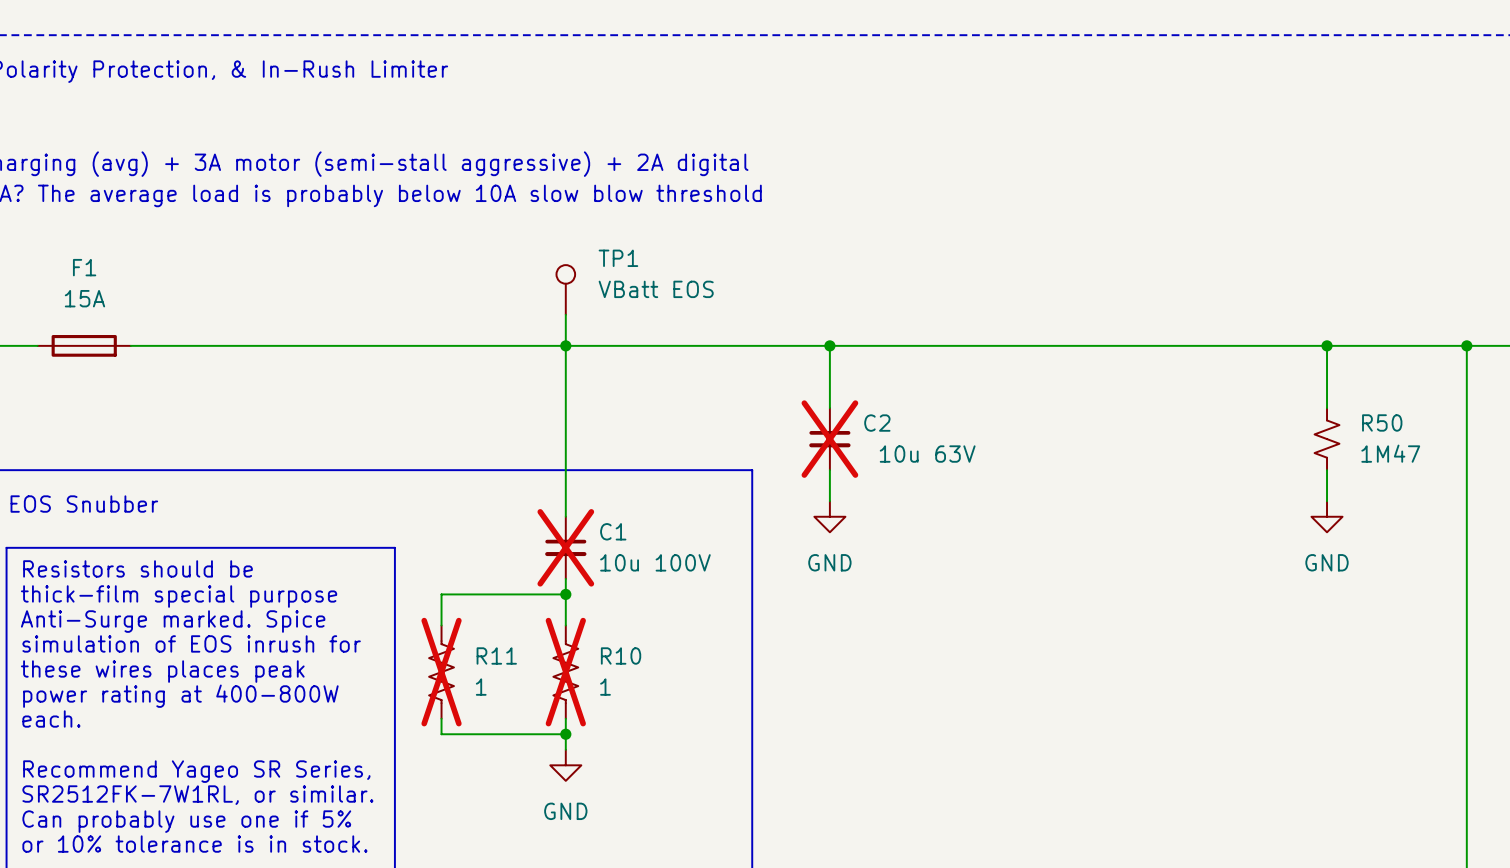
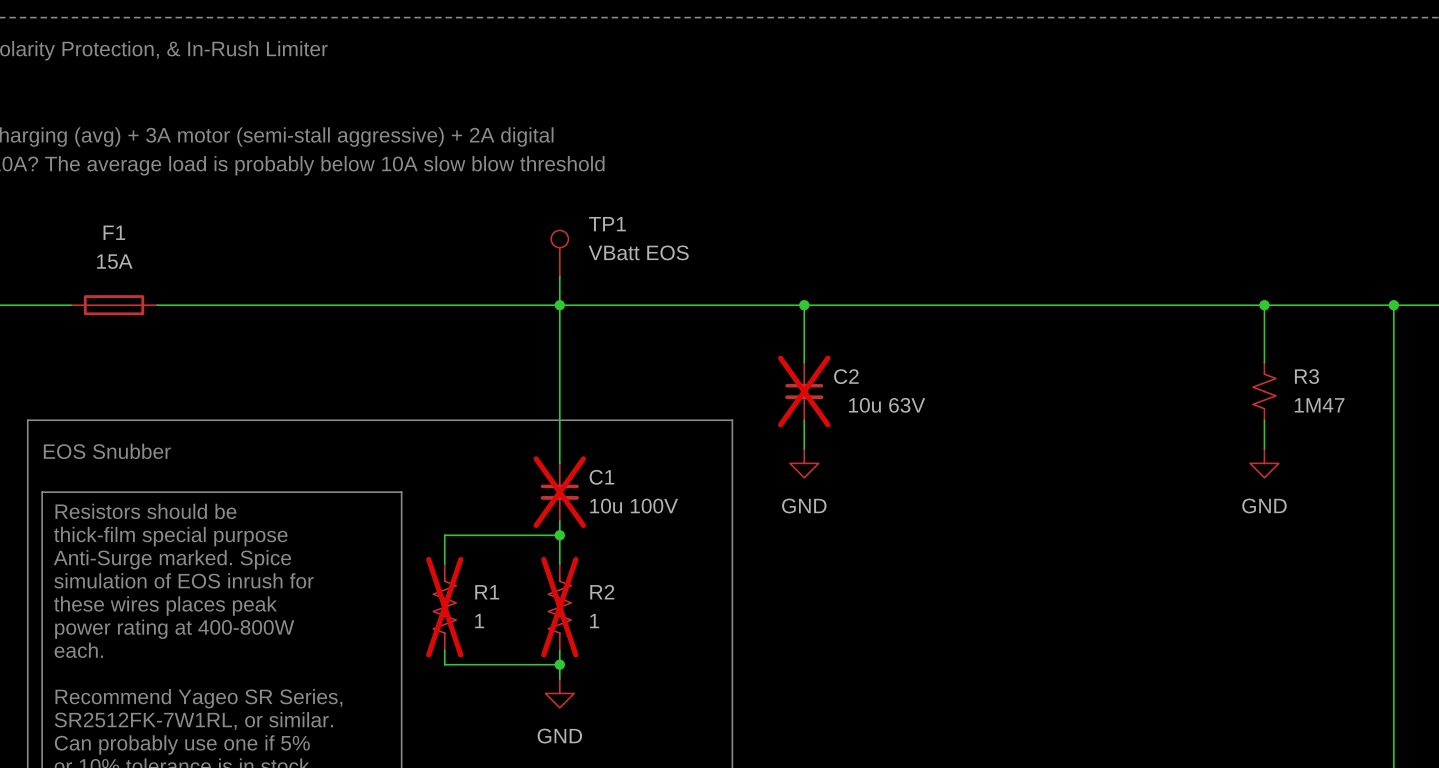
R50 name: R50 (1382, 422) -> R3 (1306, 376)
R11 name: R11 (496, 655) -> R1 (487, 592)
R10 name: R10 (621, 655) -> R2 (602, 592)

